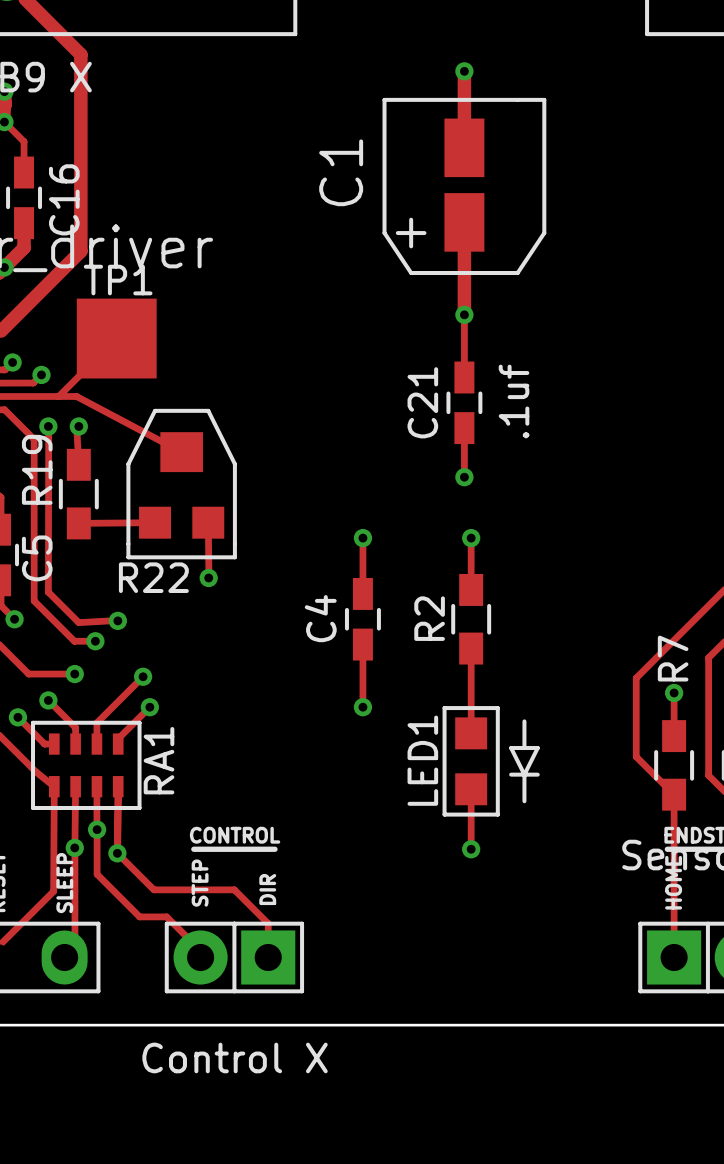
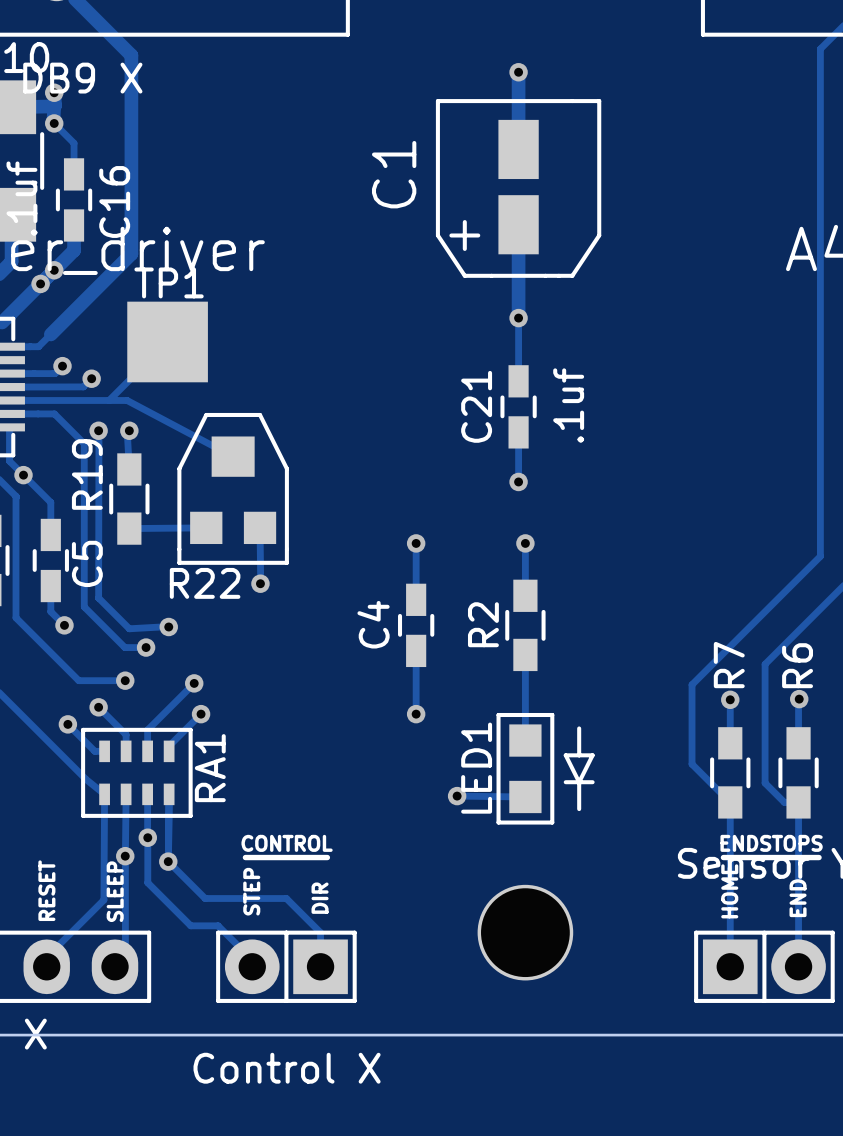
track: (471, 789) (471, 849) -> (525, 796) (457, 796)
via position: (471, 849) -> (457, 796)
part: none -> (525, 932)

